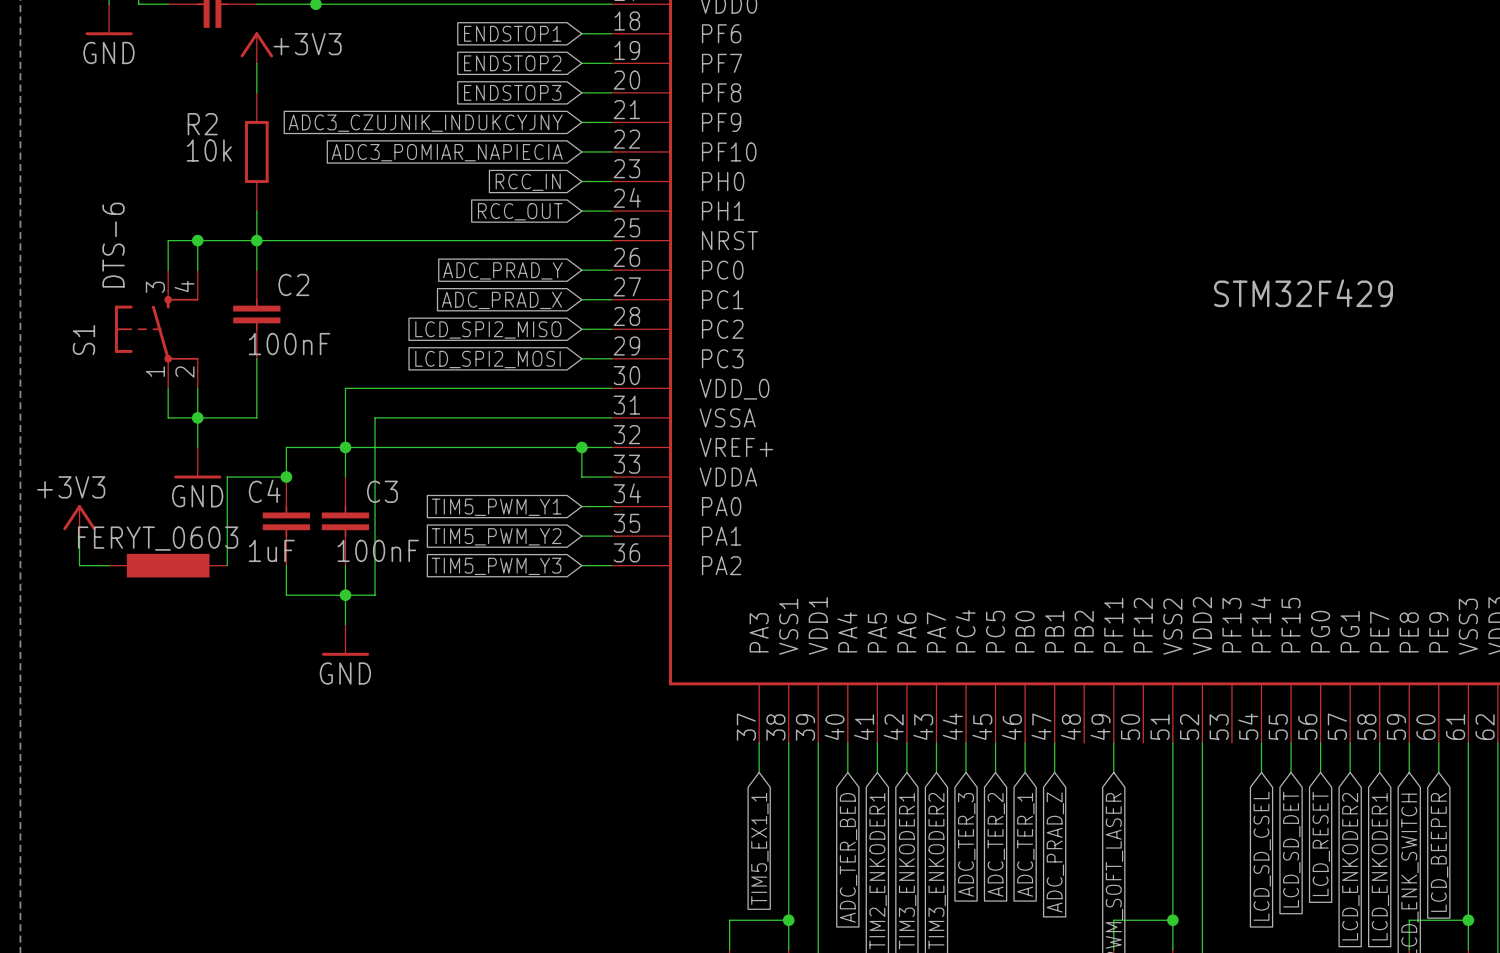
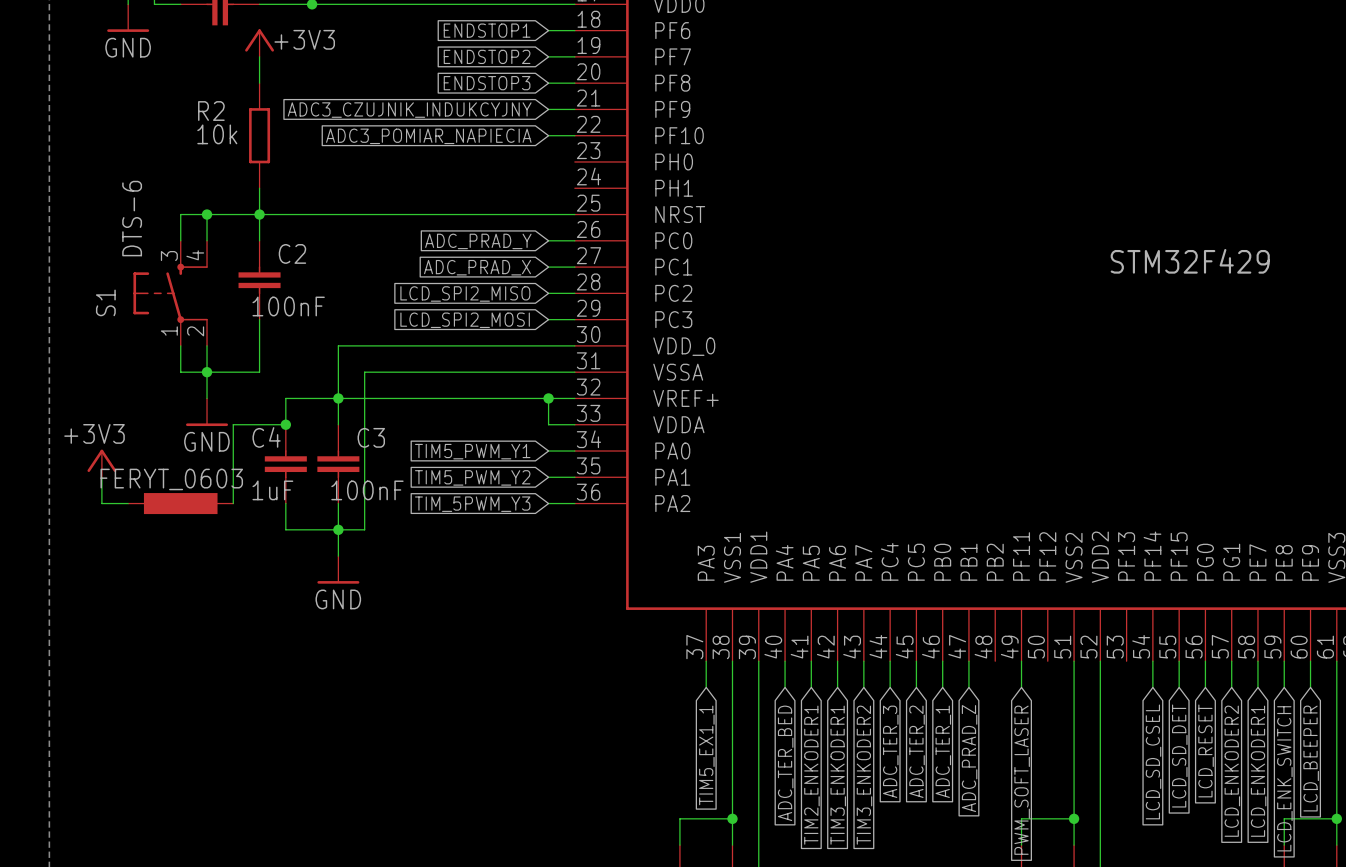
wire: (581, 181) (611, 181) -> none
global label: RCC_IN (528, 182) -> none
global label: RCC_OUT (520, 211) -> none
wire: (581, 211) (611, 211) -> none
global label: TIM5_PWM_Y3 (496, 566) -> TIM_5PWM_Y3 (472, 504)

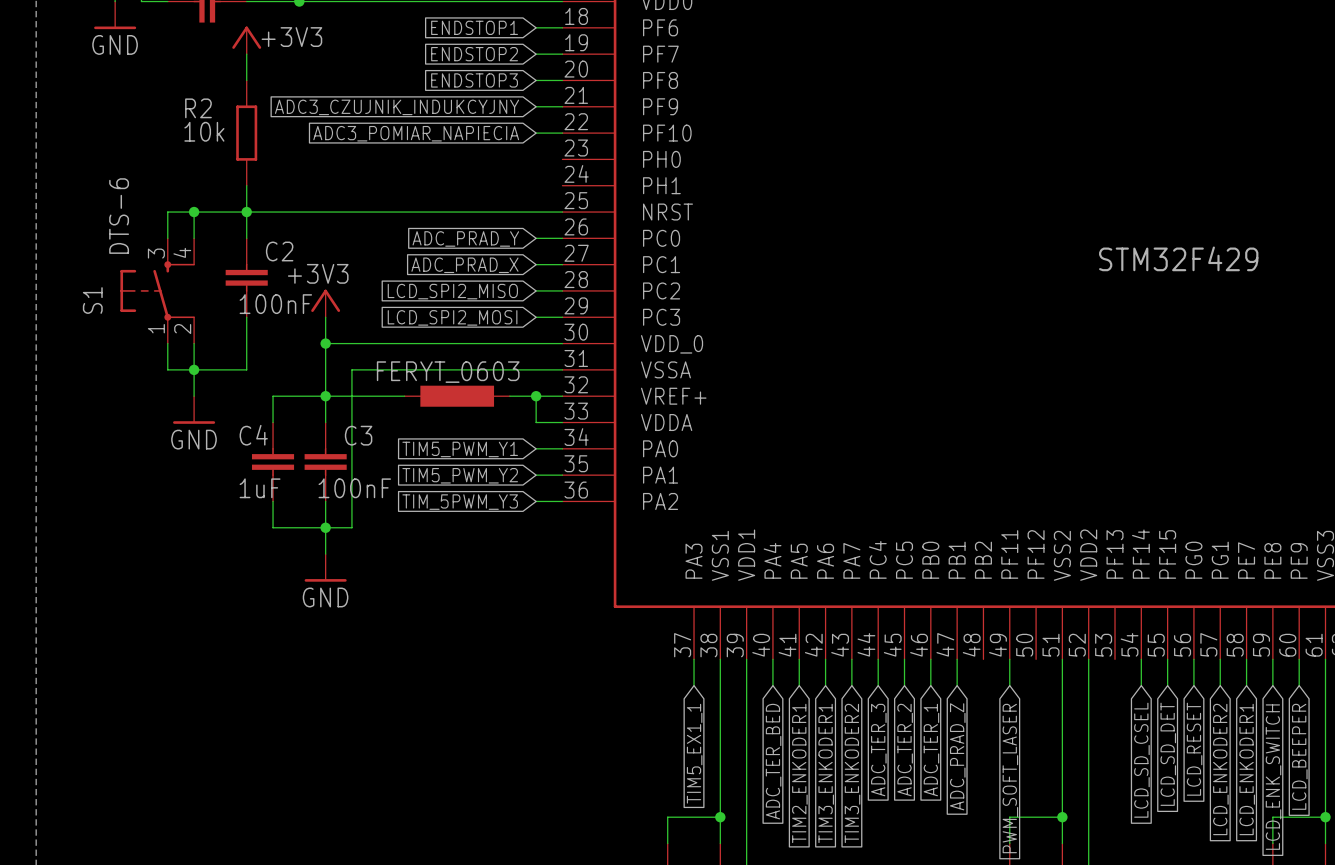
power symbol: none -> +3V3 (325, 303)
wire: none -> (325, 317) (325, 343)
junction: none -> (325, 343)
part: none -> FERYT_0603 (457, 396)
wire: (285, 424) (233, 424) (233, 503) -> none
junction: (285, 424) -> none
power symbol: +3V3 (101, 463) -> none
wire: (101, 477) (101, 503) (128, 503) -> none
part: FERYT_0603 (180, 503) -> none

